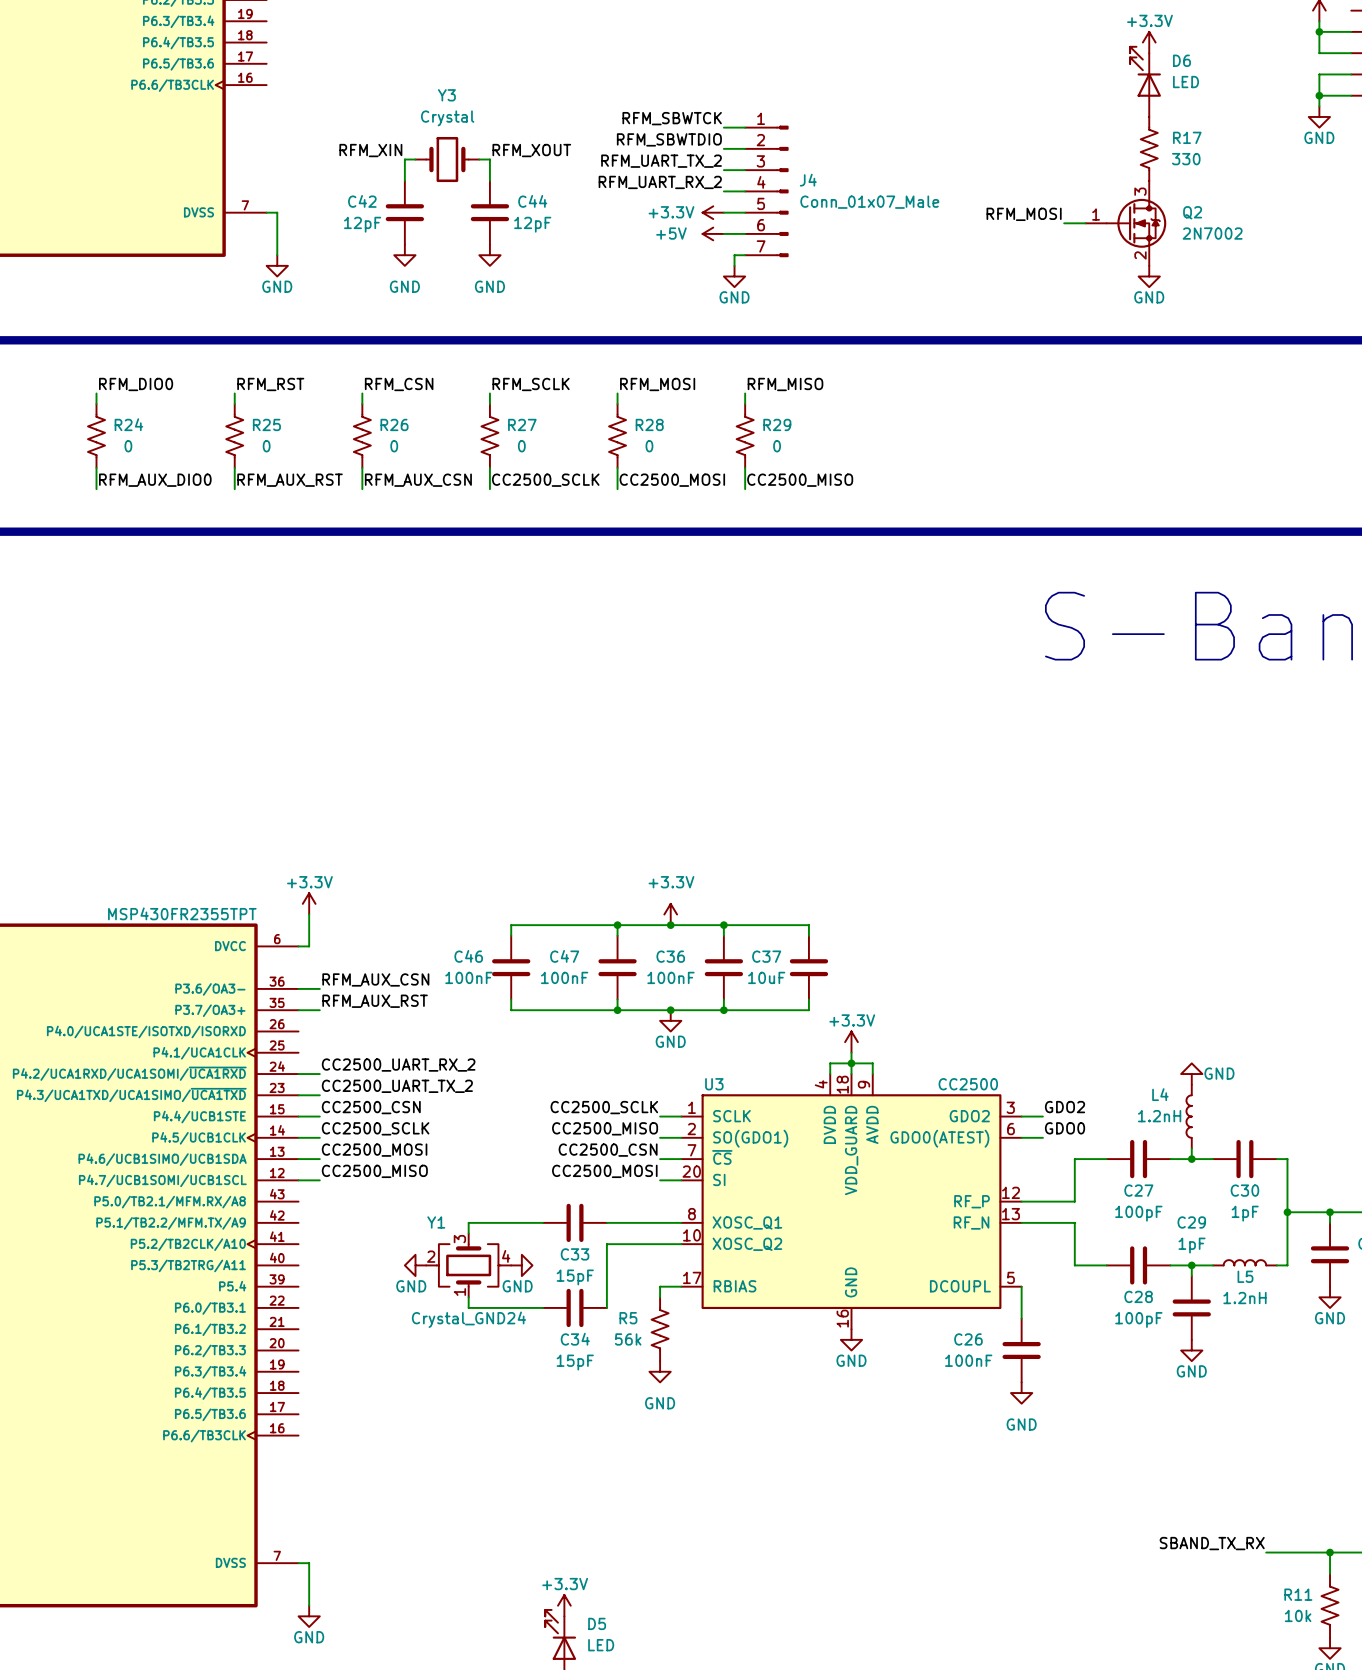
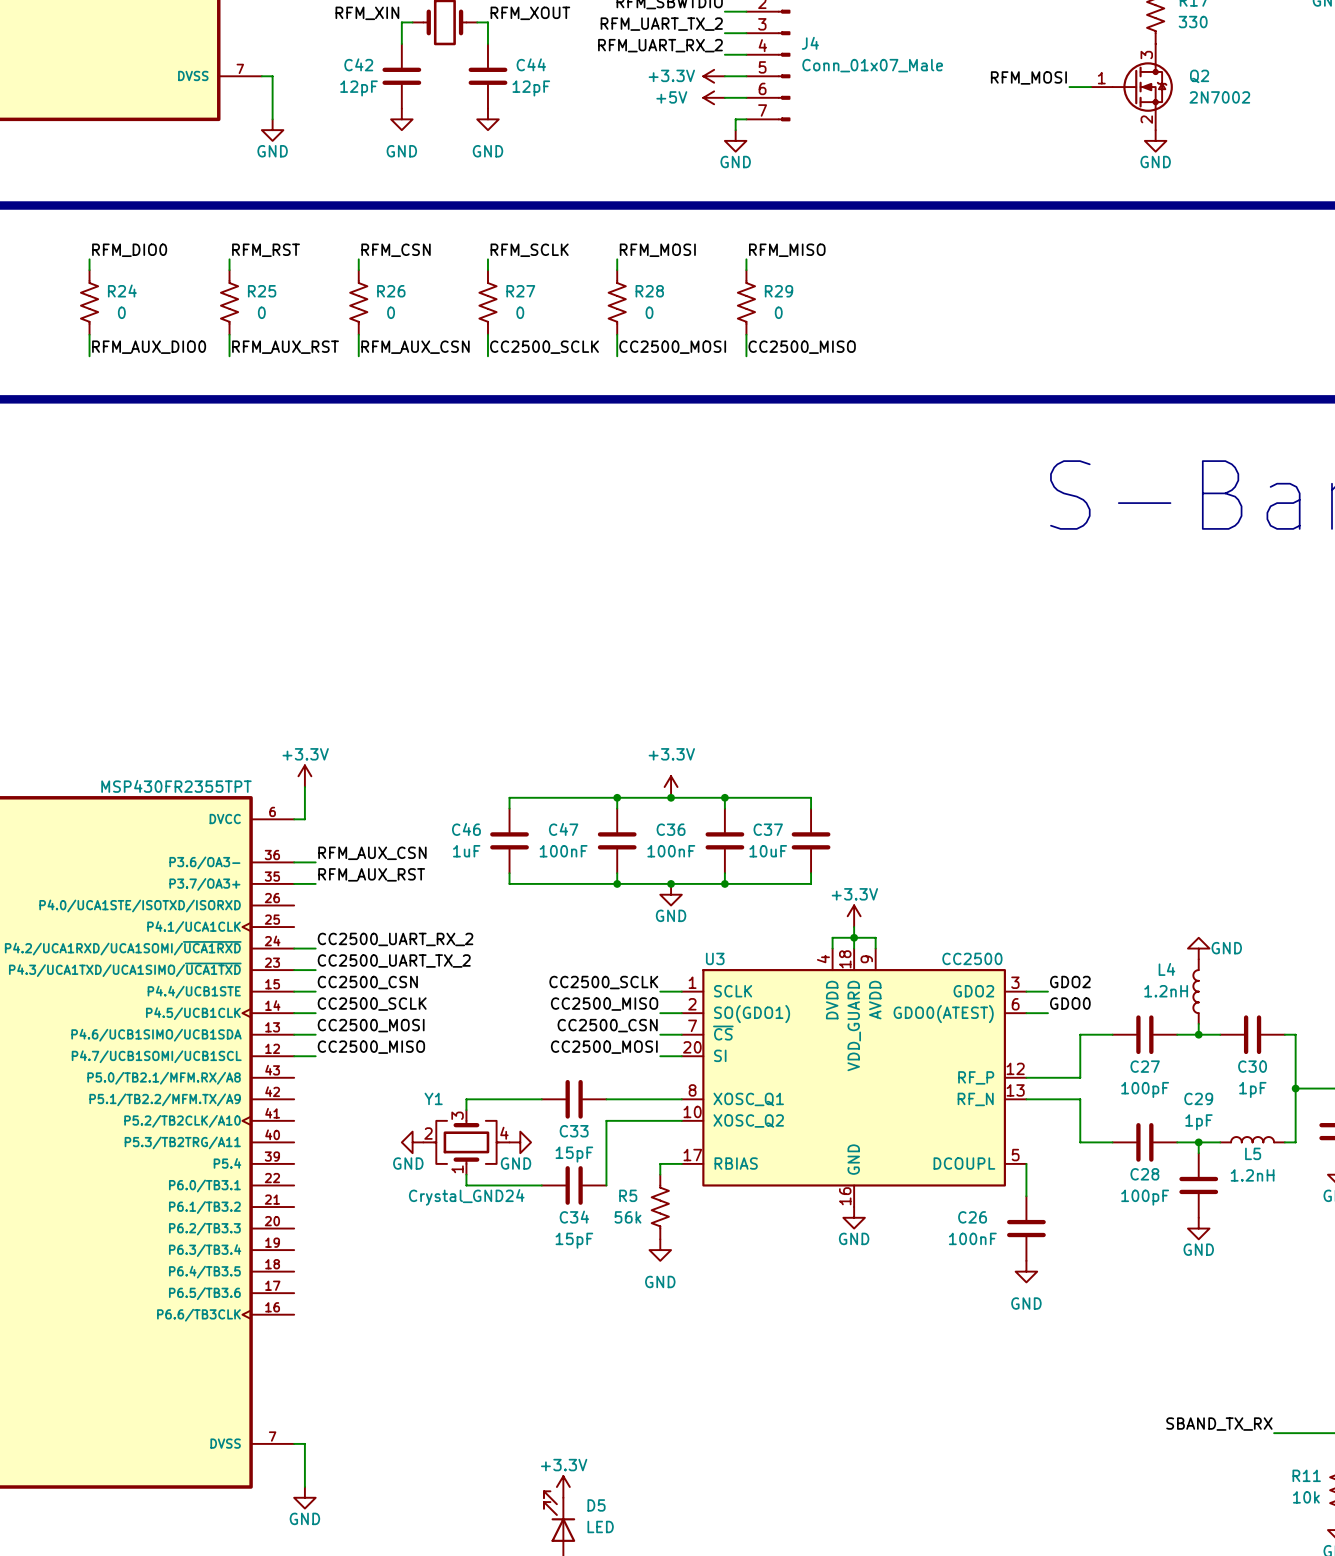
C46 value: 100nF (468, 977) -> 1uF (466, 851)

